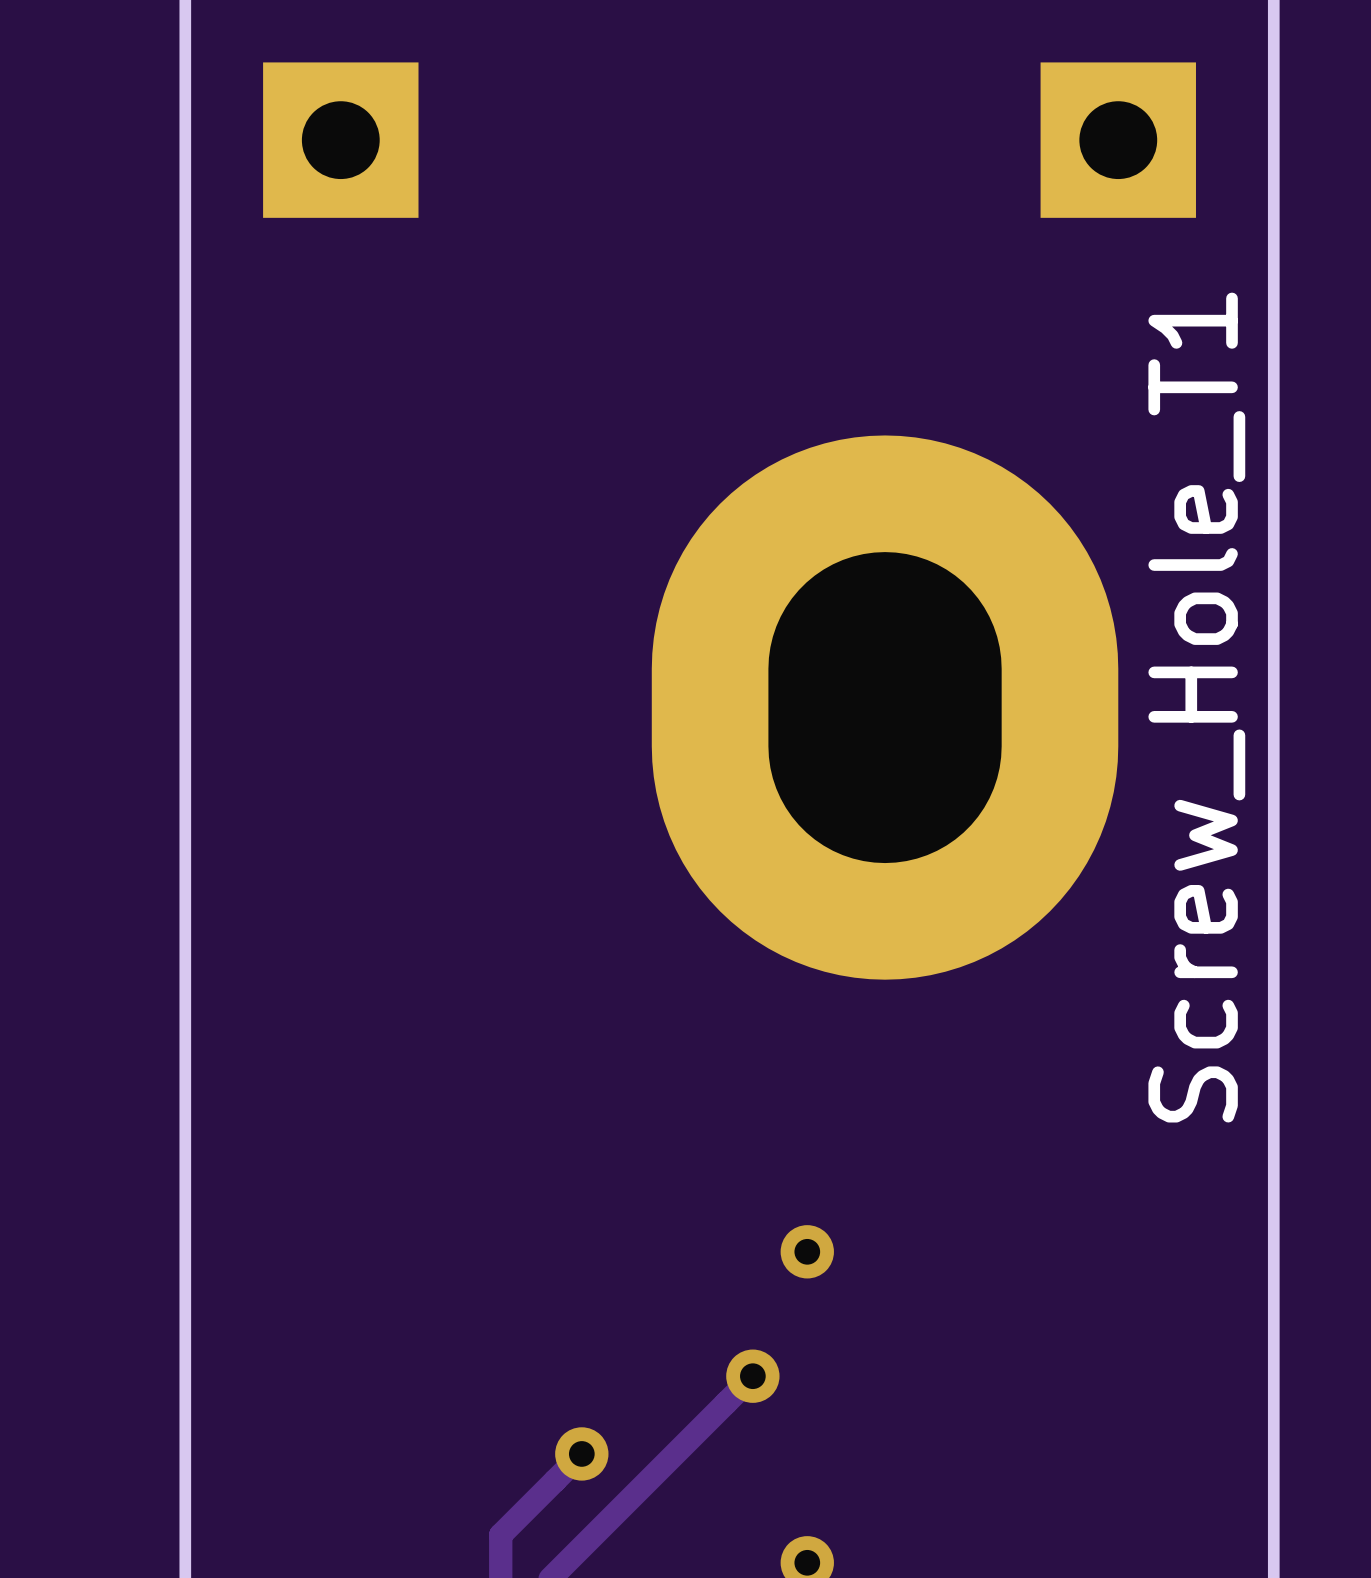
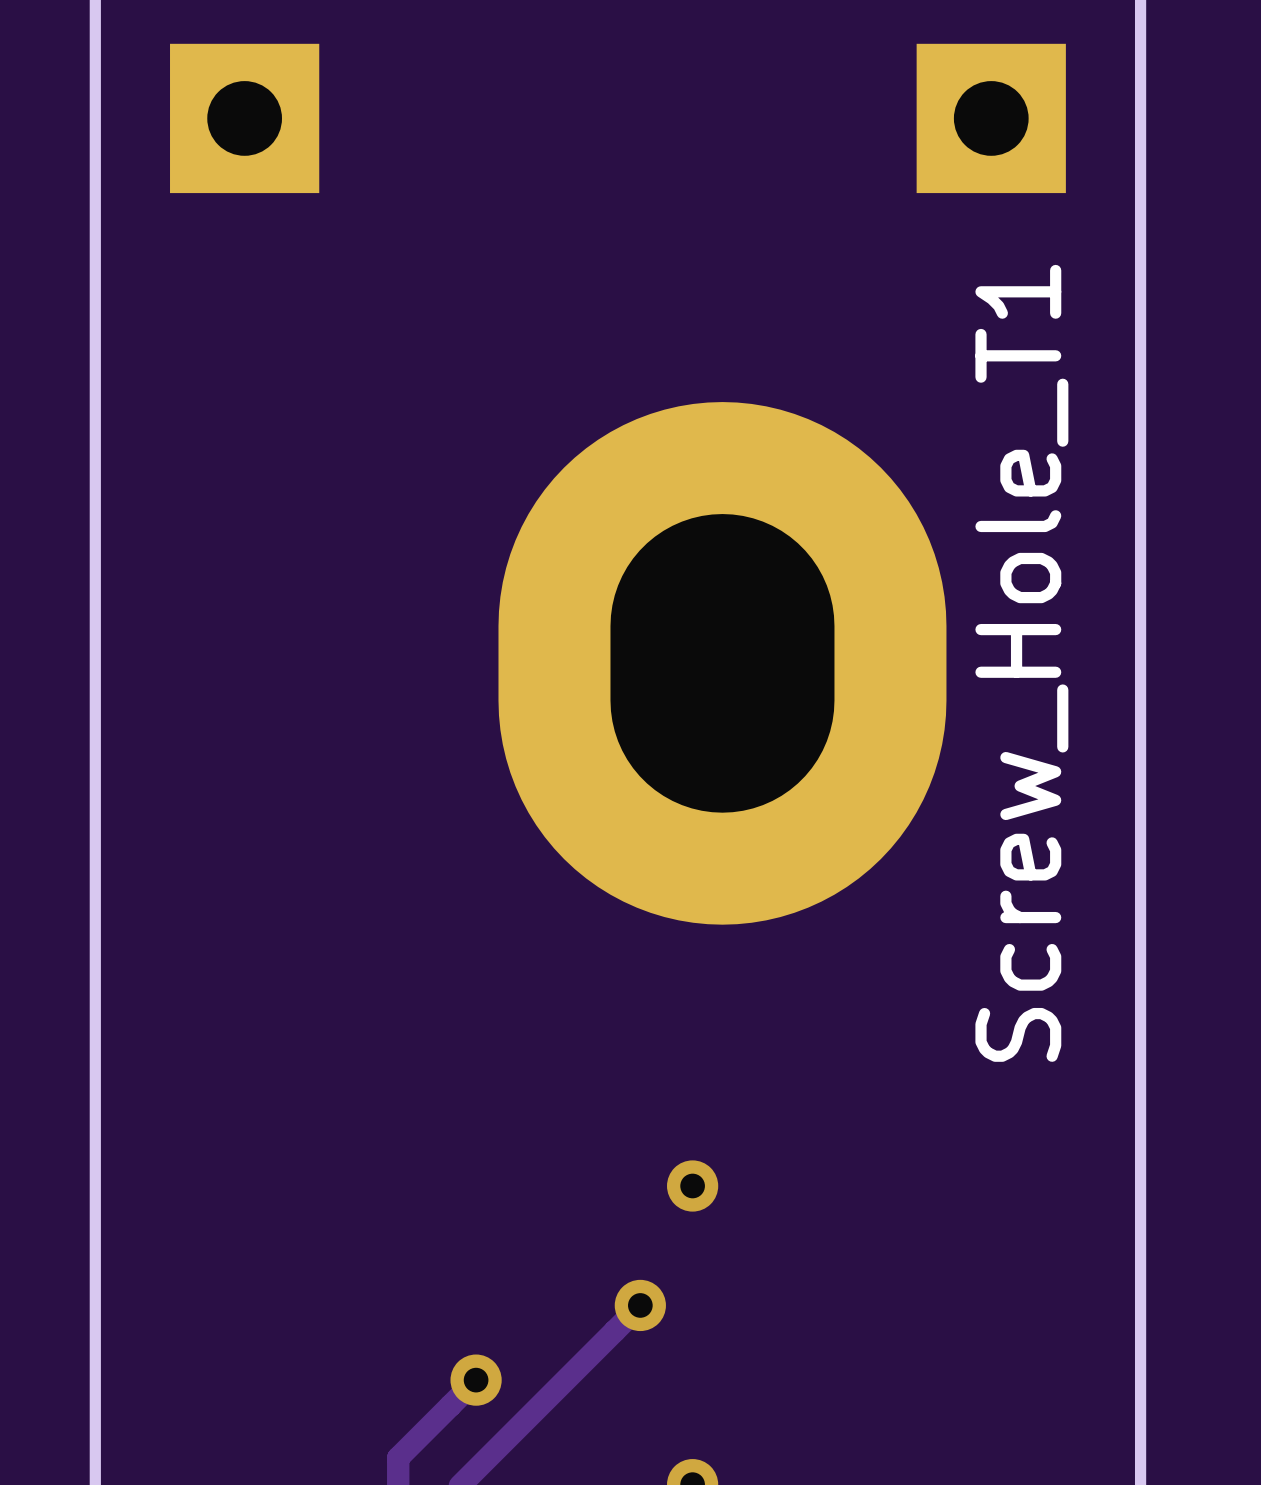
Screw_Hole_T1 position: (885, 707) -> (722, 663)

